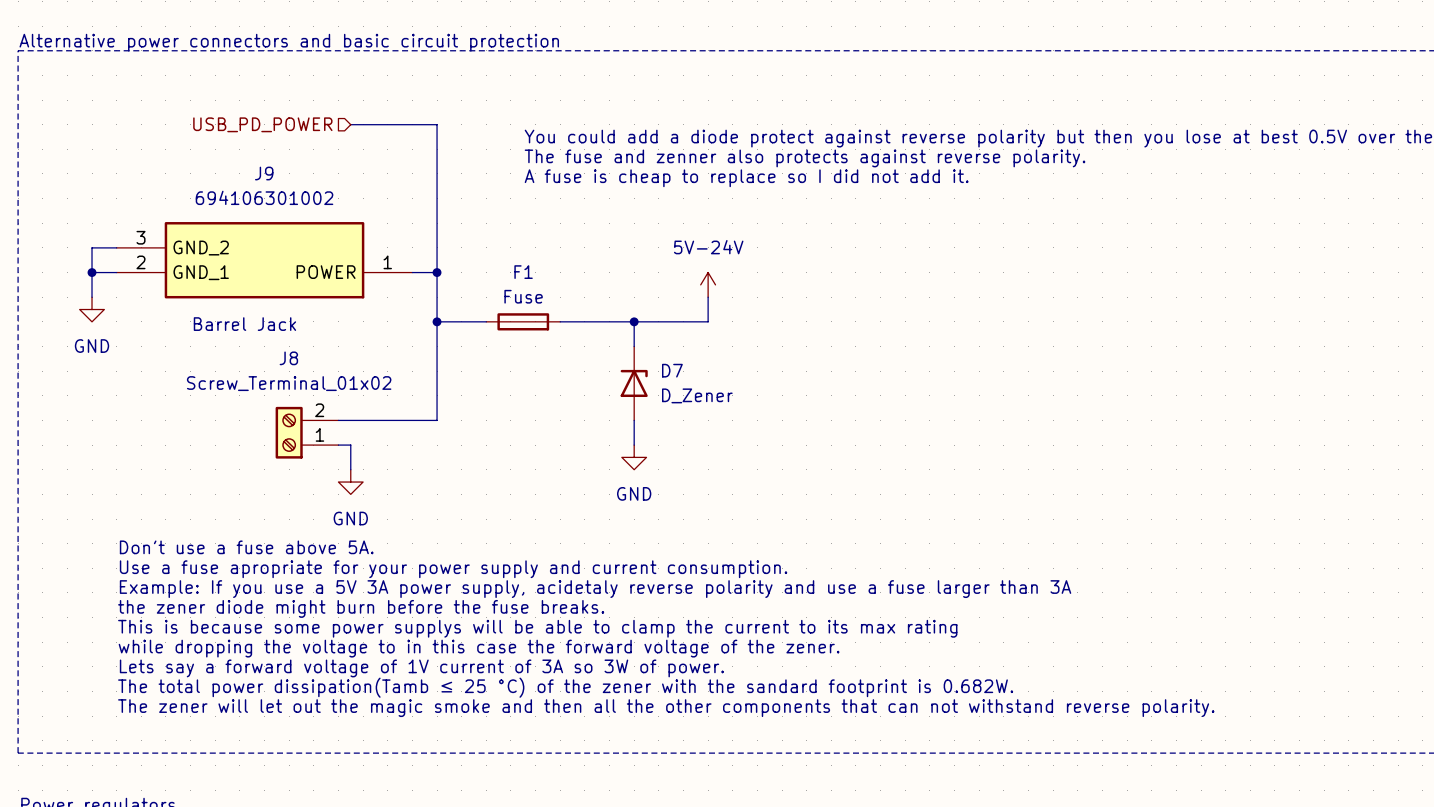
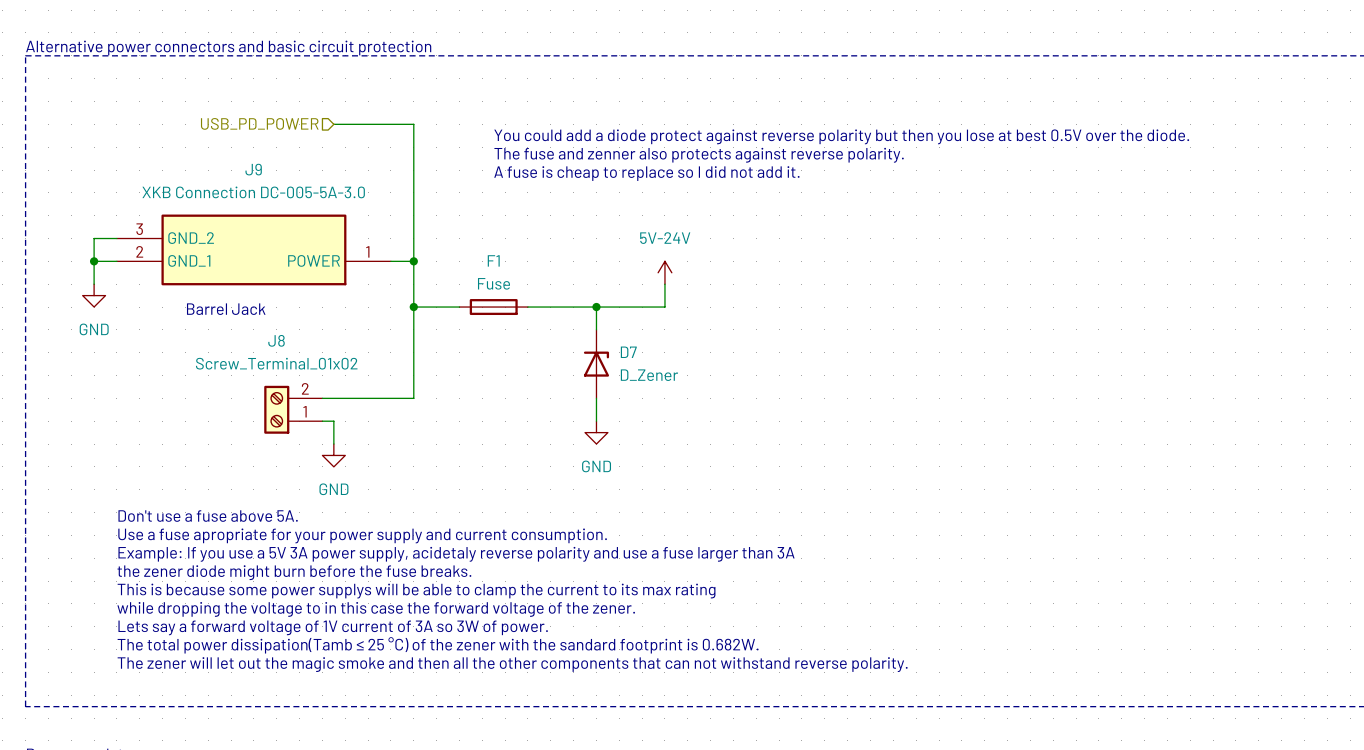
J9 value: 694106301002 (264, 197) -> XKB Connection DC-005-5A-3.0 (253, 192)

